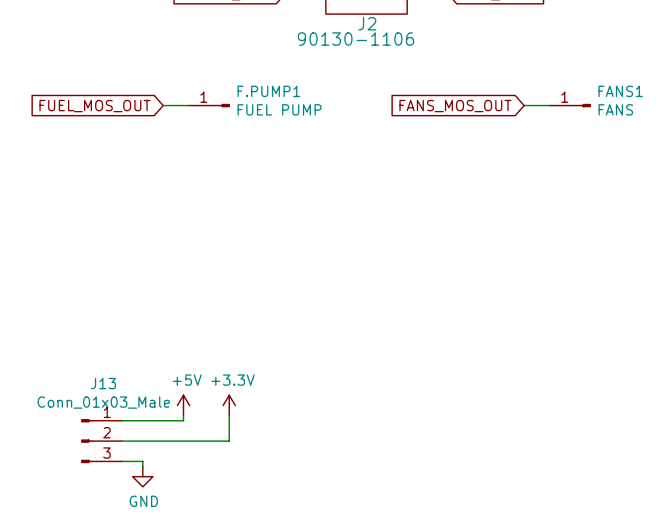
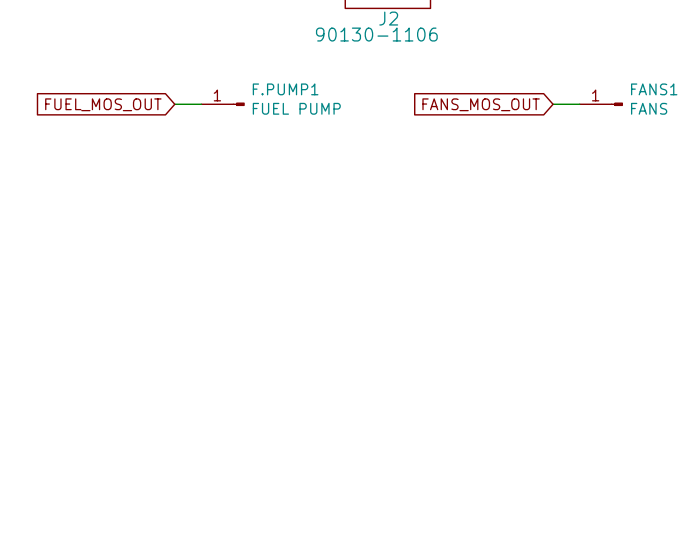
power symbol: +5V (183, 405) -> none
power symbol: +3.3V (229, 405) -> none
wire: (183, 415) (183, 420) (122, 420) -> none
wire: (229, 415) (229, 441) (122, 441) -> none
J13: Conn_01x03_Male (101, 441) -> none
wire: (122, 461) (142, 461) (142, 466) -> none
power symbol: GND (142, 476) -> none

